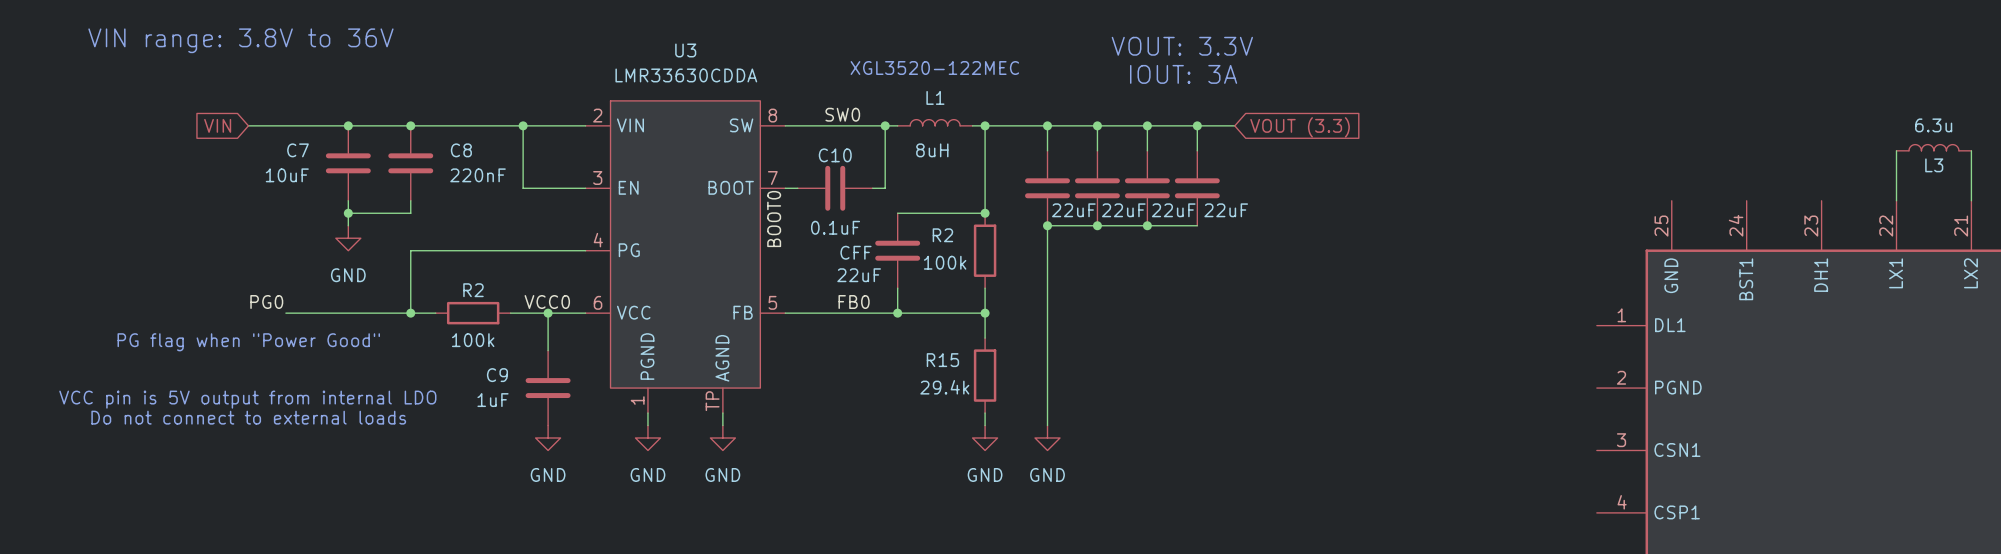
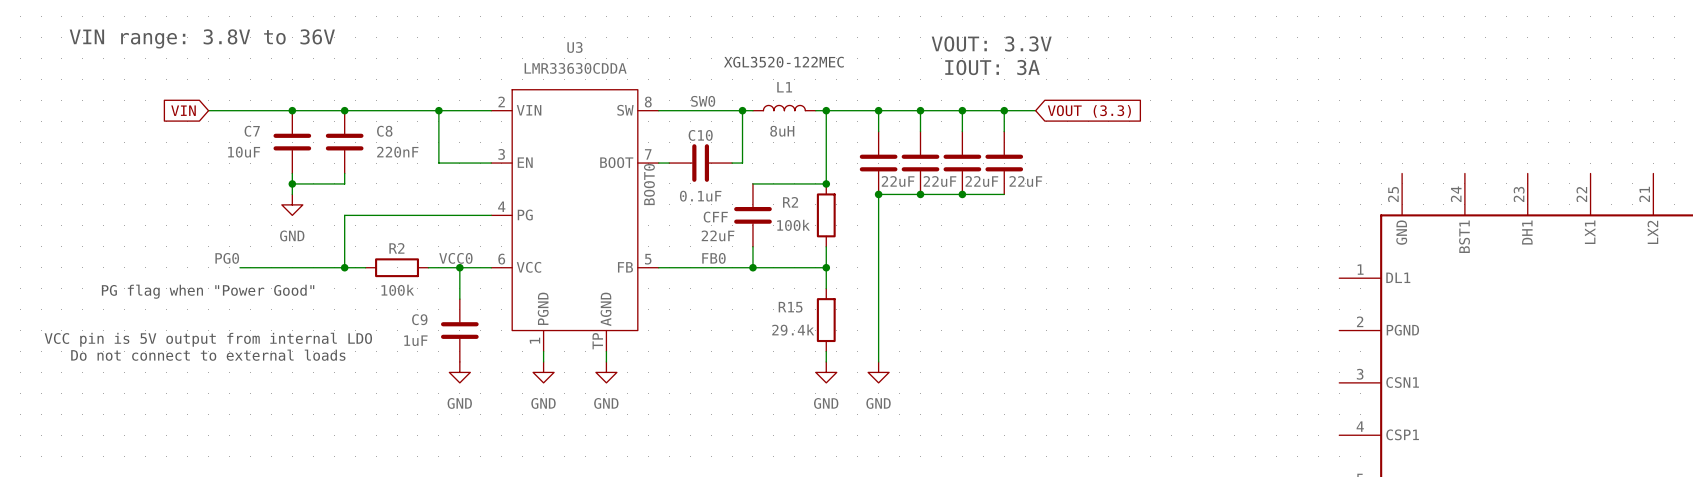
L3: 6.3u (1933, 147) -> none
wire: (1896, 150) (1896, 200) -> none
wire: (1971, 150) (1971, 200) -> none

